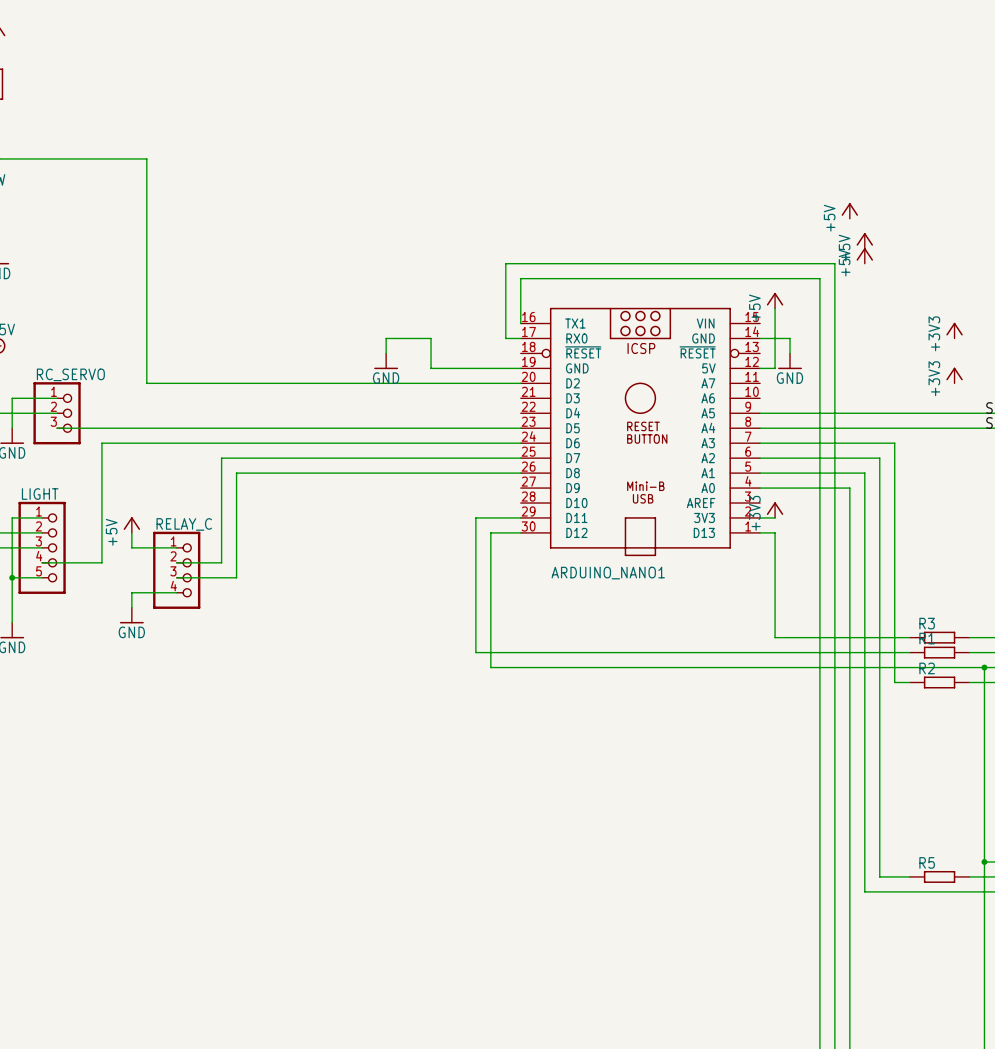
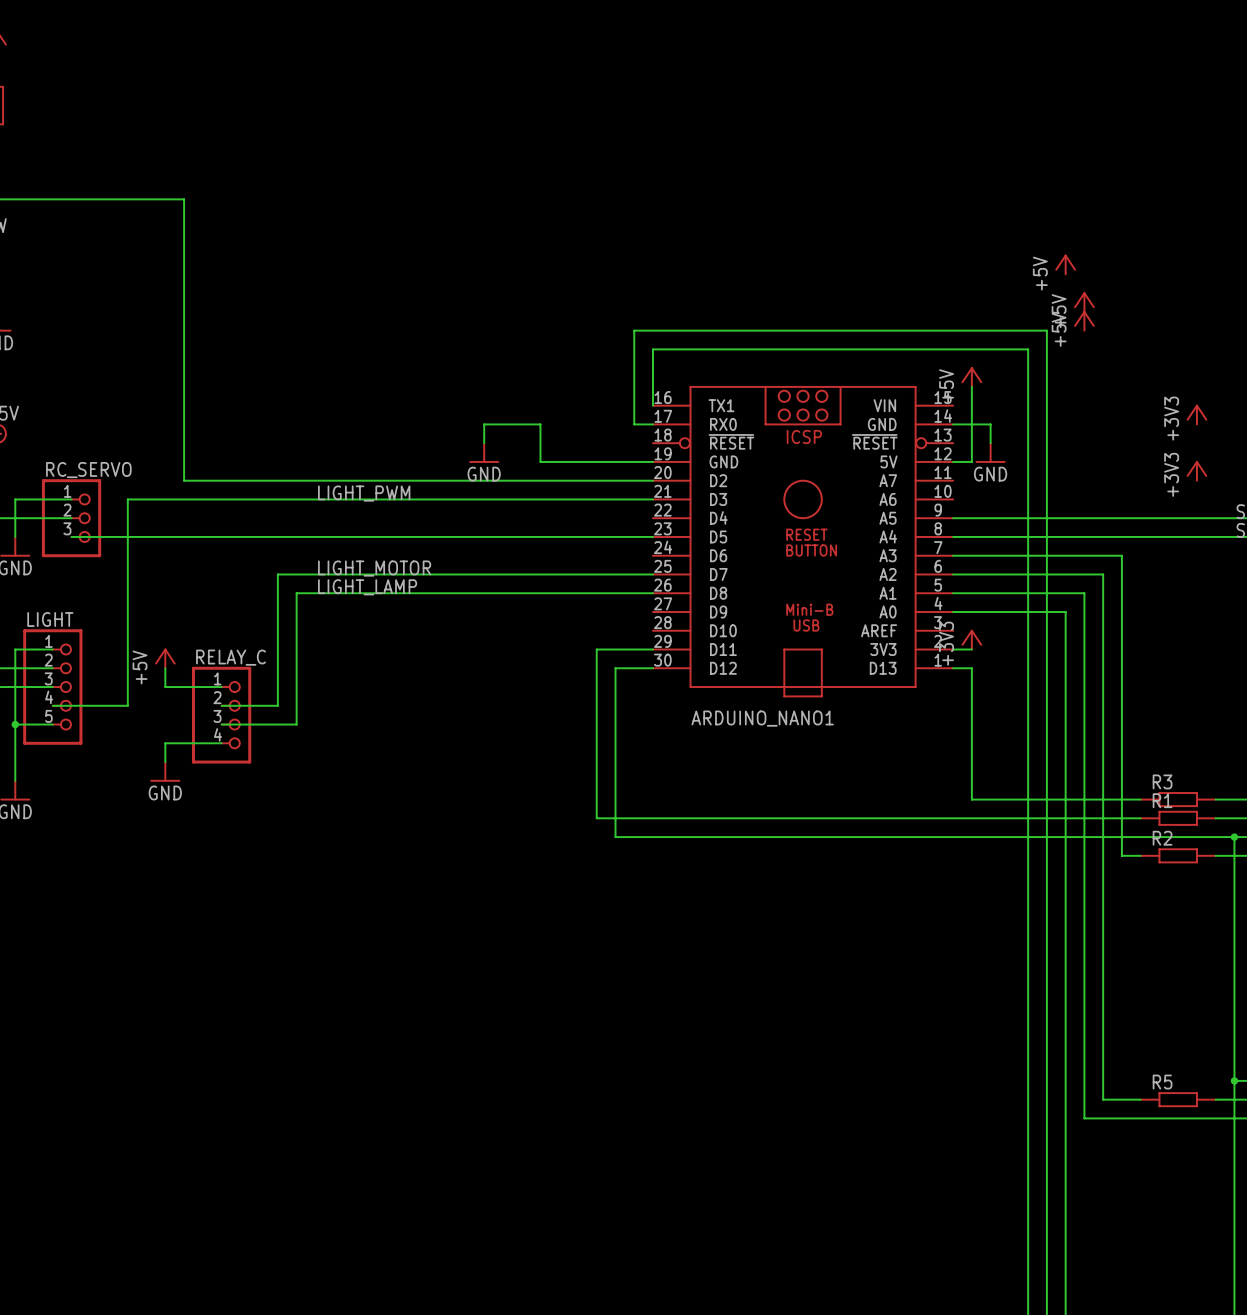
label: none -> LIGHT_PWM (364, 493)
wire: (101, 443) (520, 443) -> (127, 555) (127, 499) (653, 499)
label: none -> LIGHT_MOTOR (374, 568)
label: none -> LIGHT_LAMP (367, 587)

